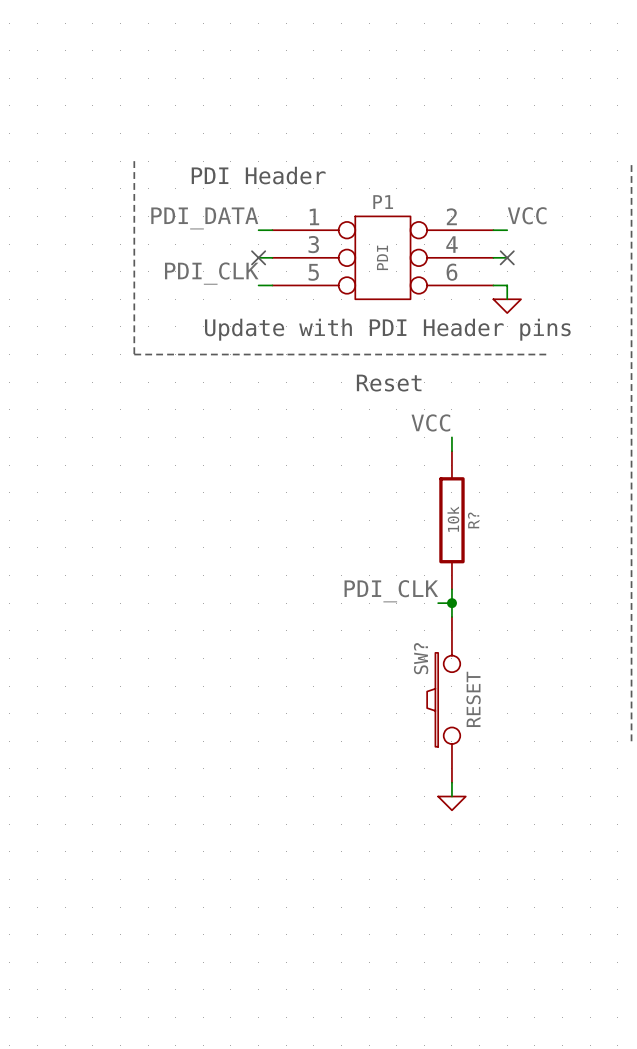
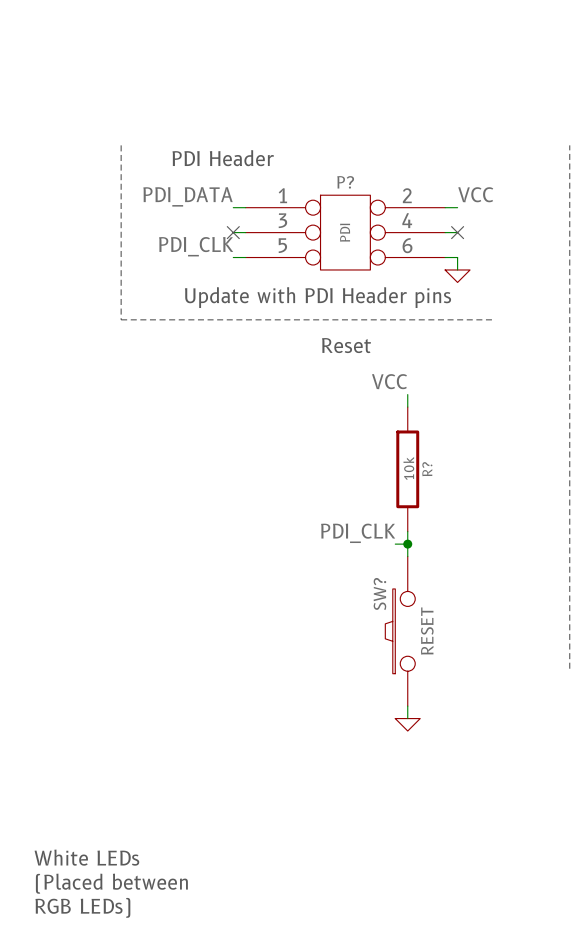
P1 name: P1 (383, 202) -> P? (345, 182)
text: none -> White LEDs (86, 857)
text: none -> (Placed between (111, 883)
text: none -> RGB LEDs) (82, 907)

